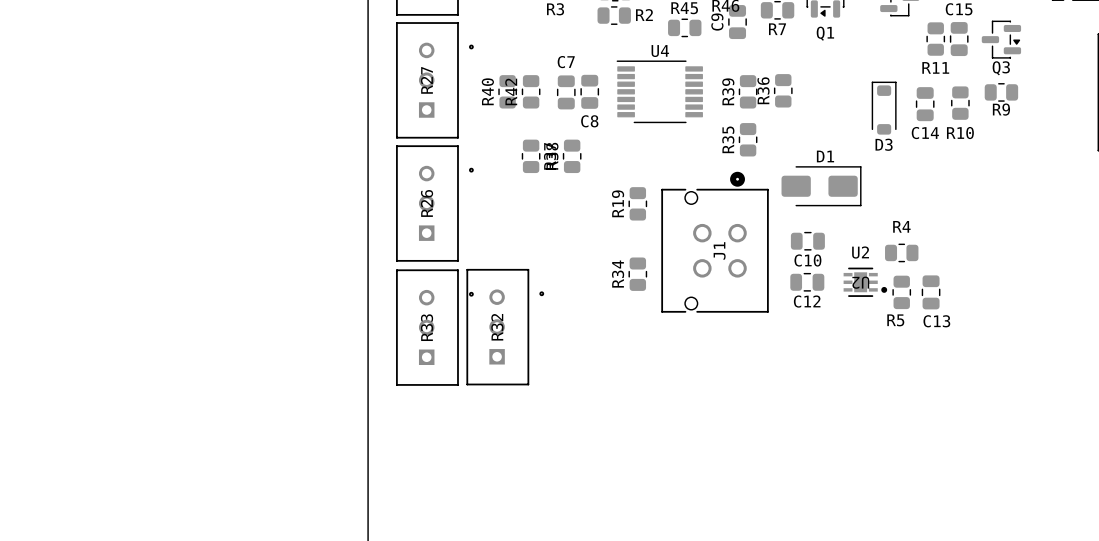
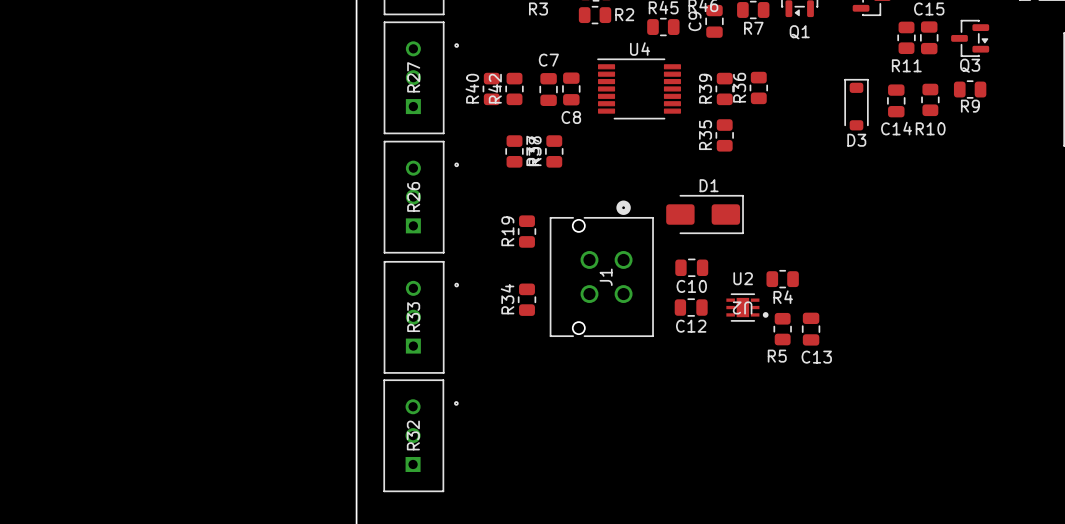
D1 position: (821, 186) -> (704, 214)
R19 position: (637, 203) -> (527, 231)
R4 name position: R4 (901, 226) -> R4 (783, 297)
C10 position: (807, 241) -> (691, 267)
J1 position: (715, 242) -> (601, 268)
R4 position: (901, 252) -> (782, 279)
R34 position: (637, 274) -> (527, 299)
C12 position: (807, 282) -> (691, 307)
U2 position: (865, 282) -> (747, 307)
R5 position: (901, 292) -> (782, 329)
C13 position: (931, 292) -> (811, 329)
R32 position: (505, 327) -> (421, 435)

